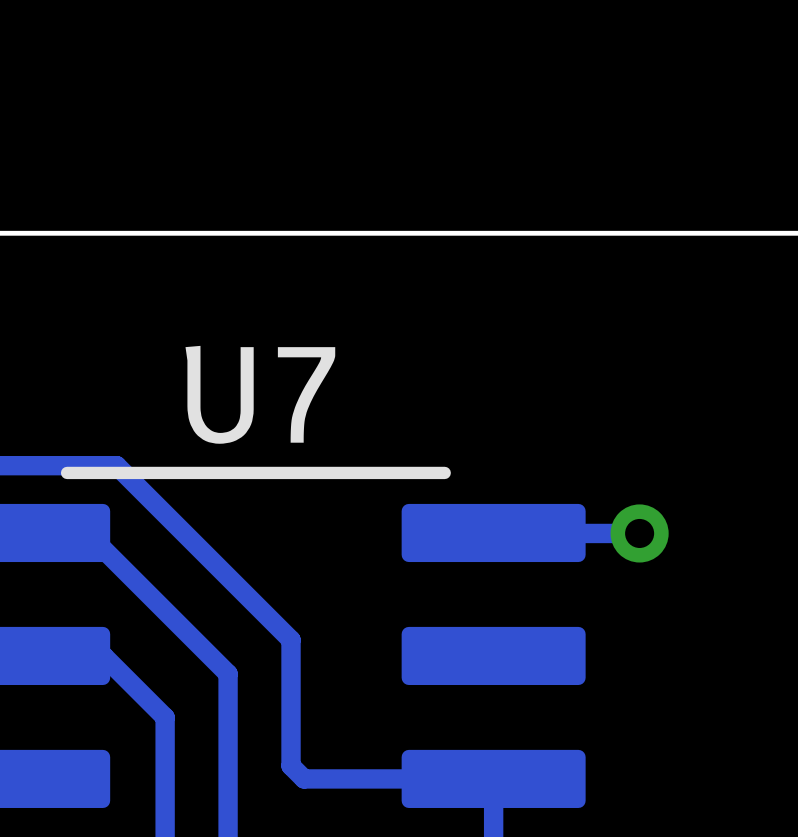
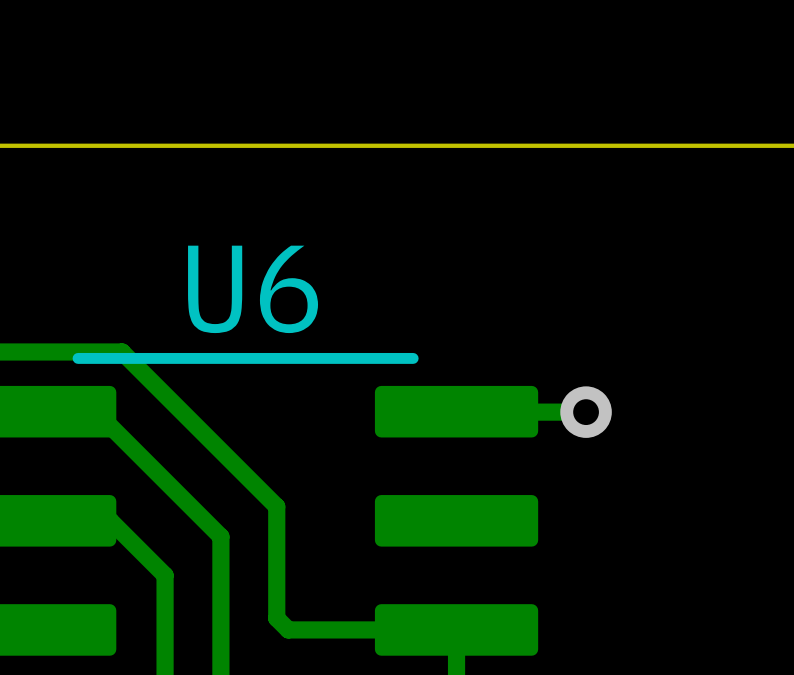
U7 name: U7 (260, 394) -> U6 (253, 289)

